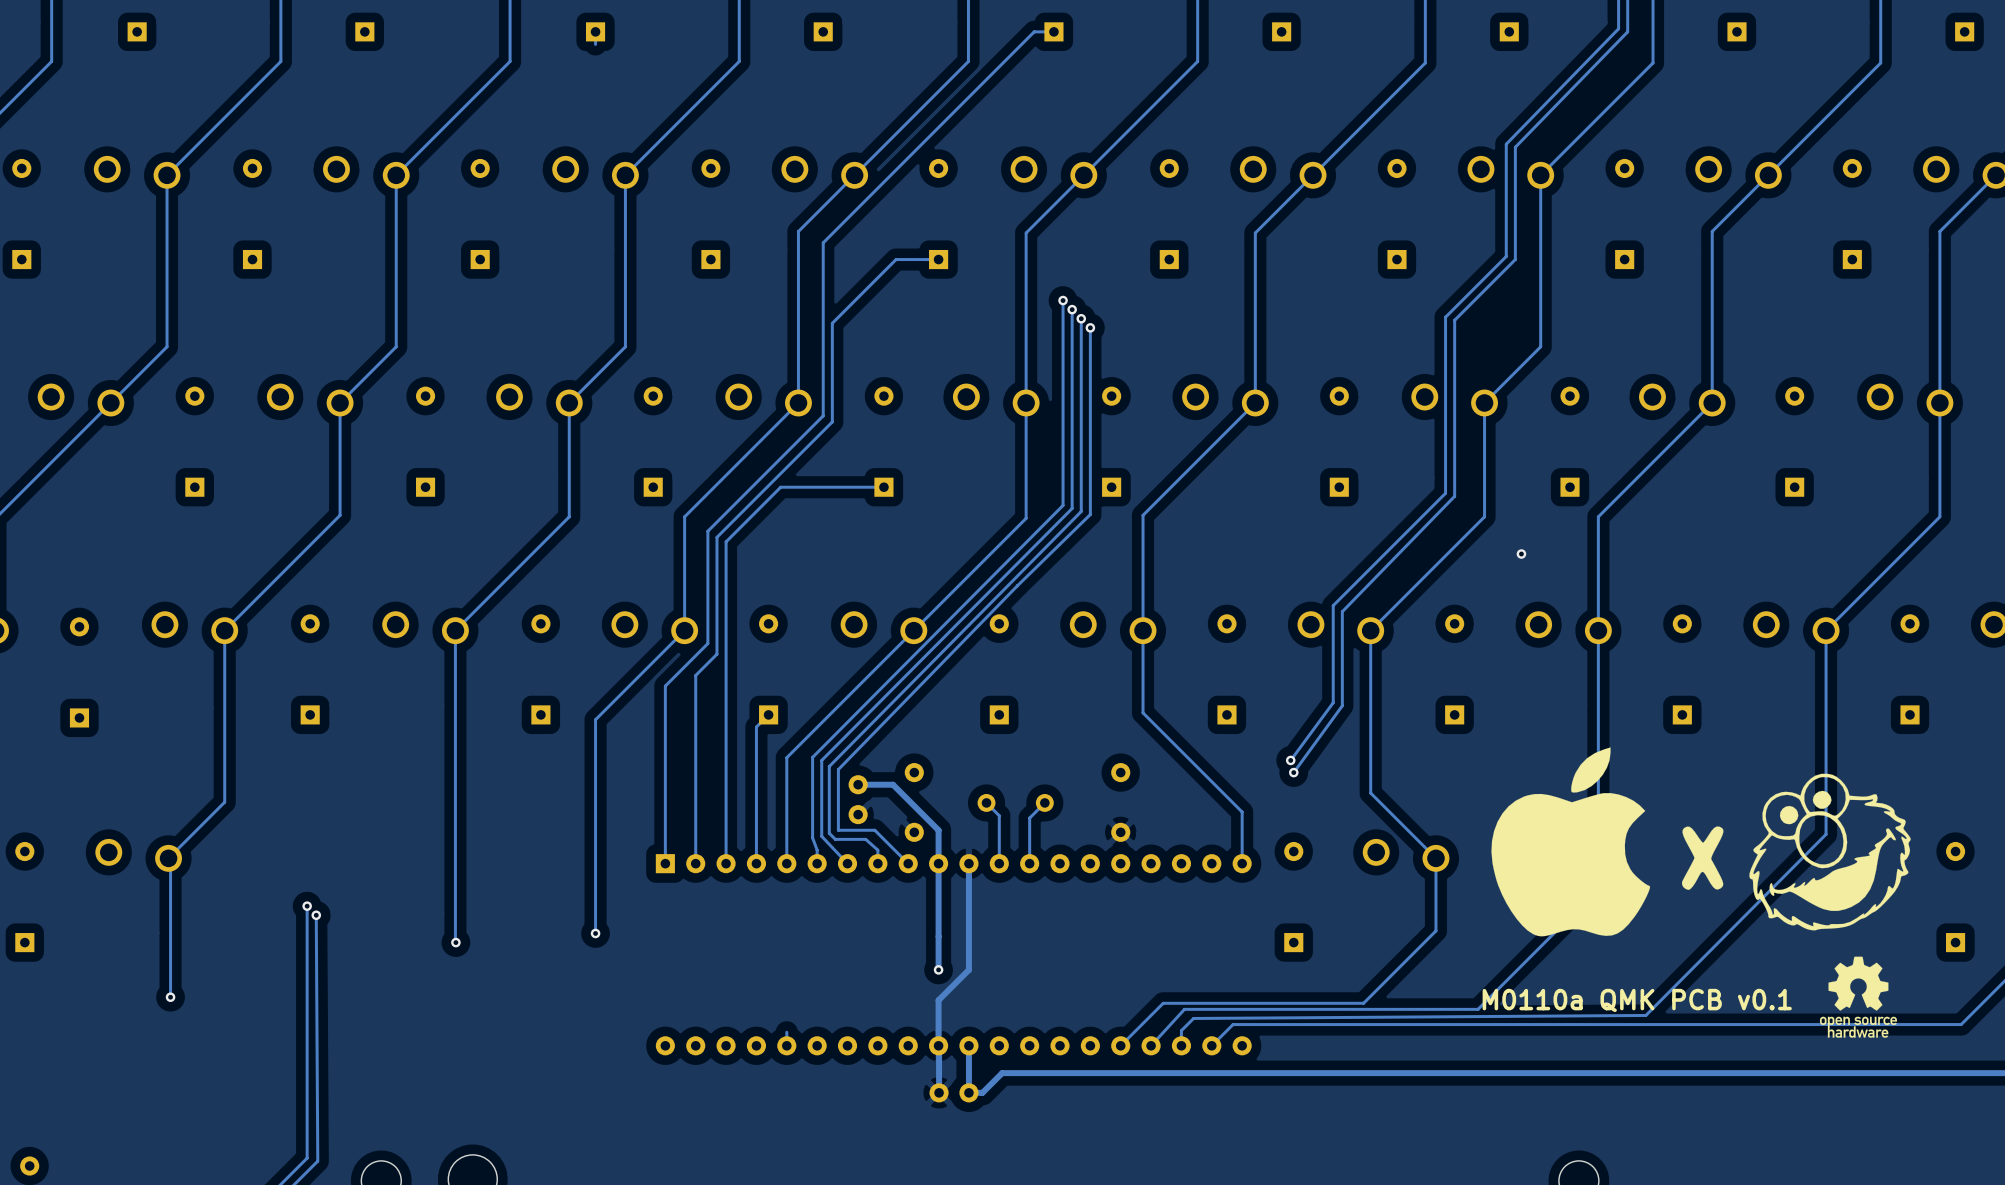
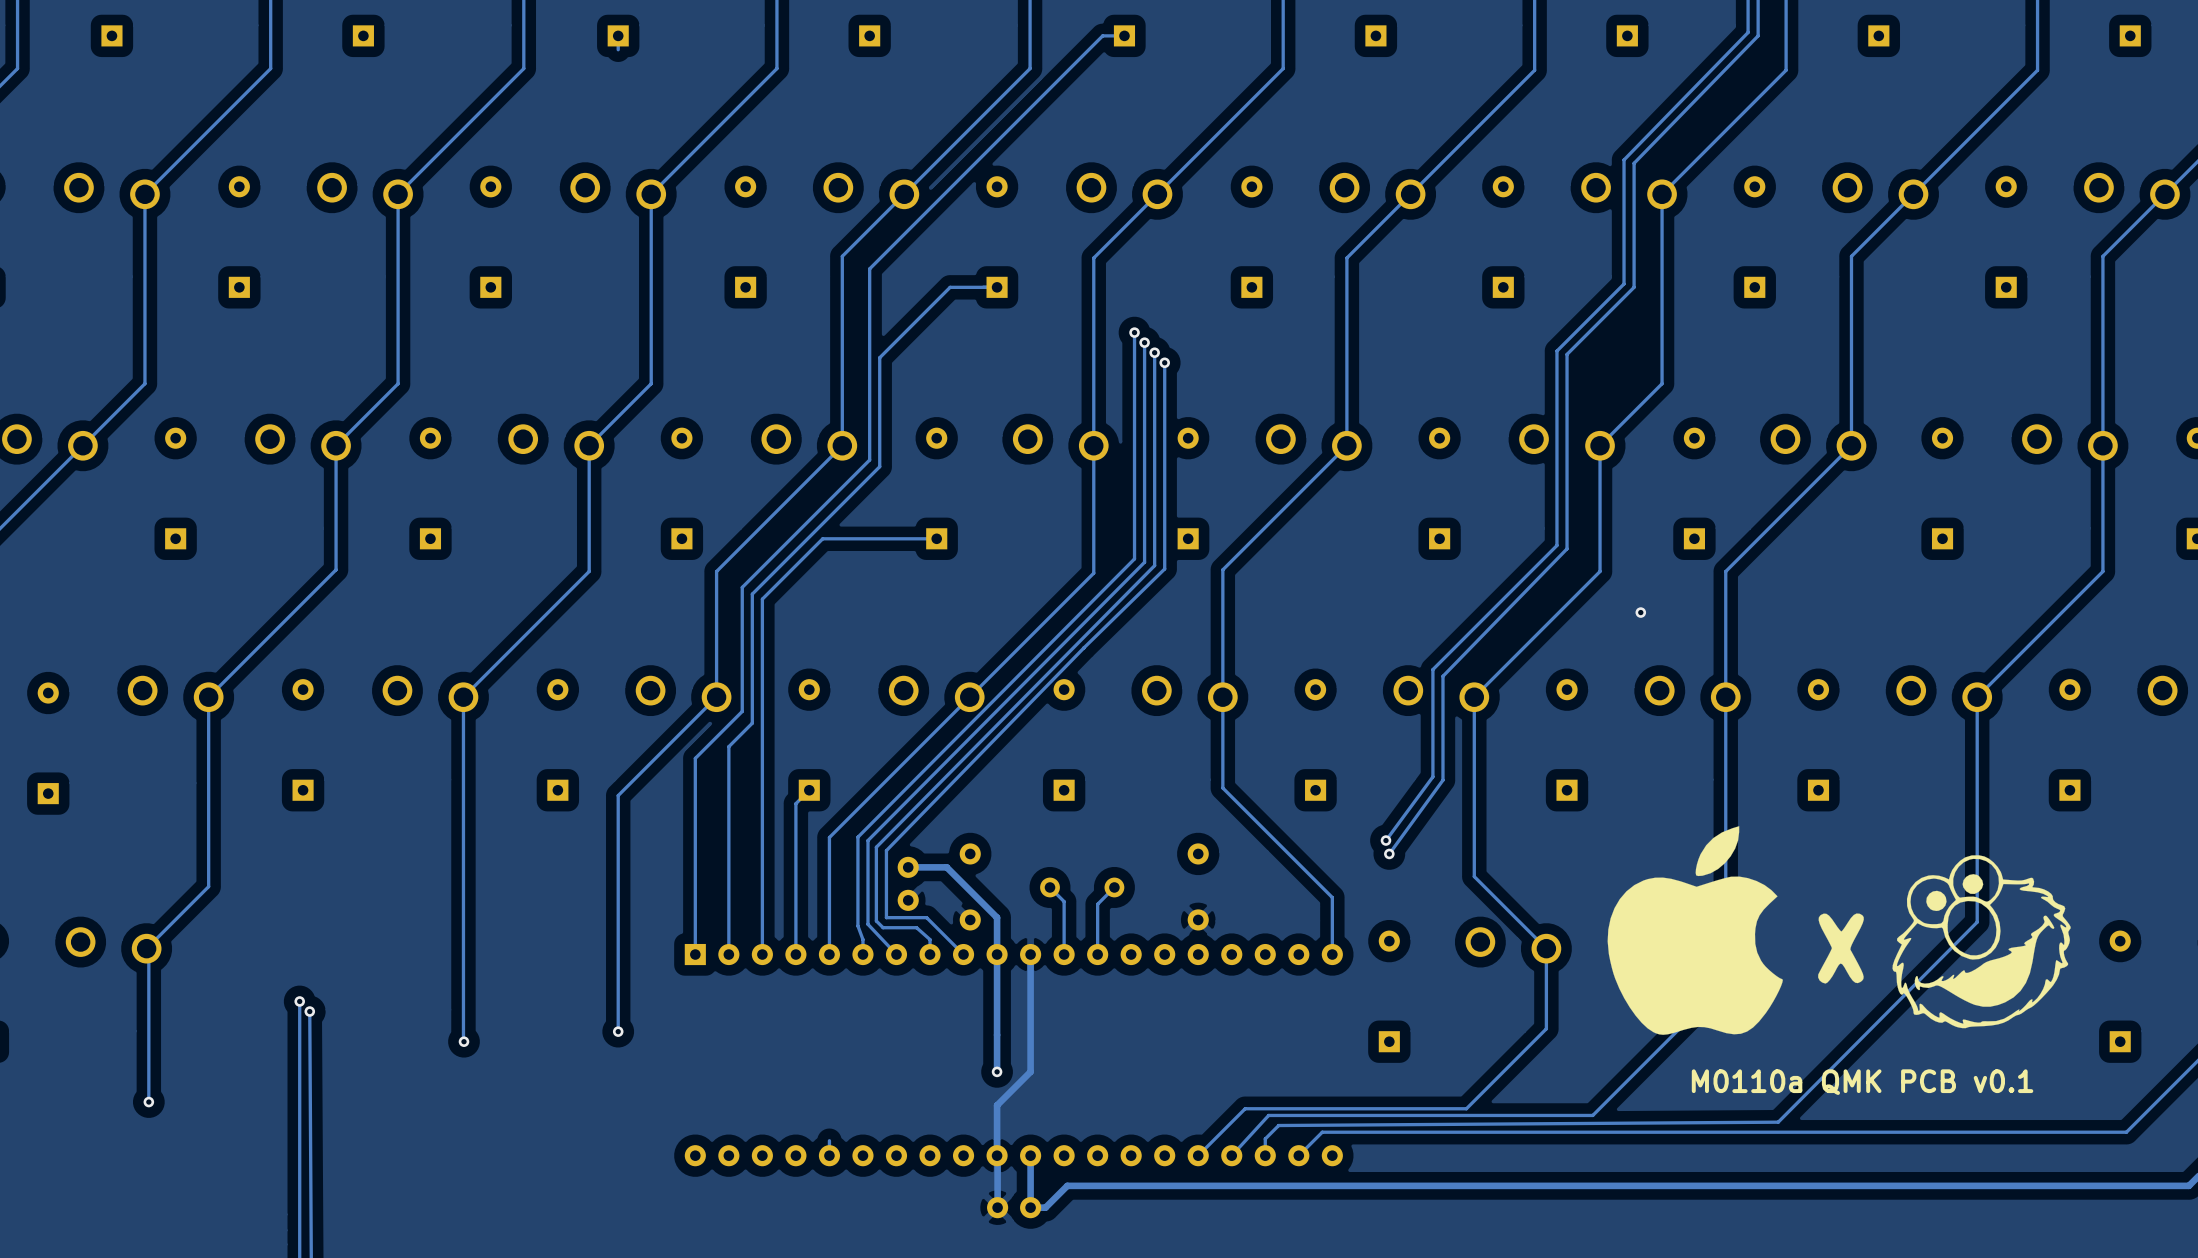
drawing: [1819, 956, 1898, 1038] -> none
text position: M0110a QMK PCB v0.1 (1637, 1000) -> M0110a QMK PCB v0.1 (1862, 1082)

